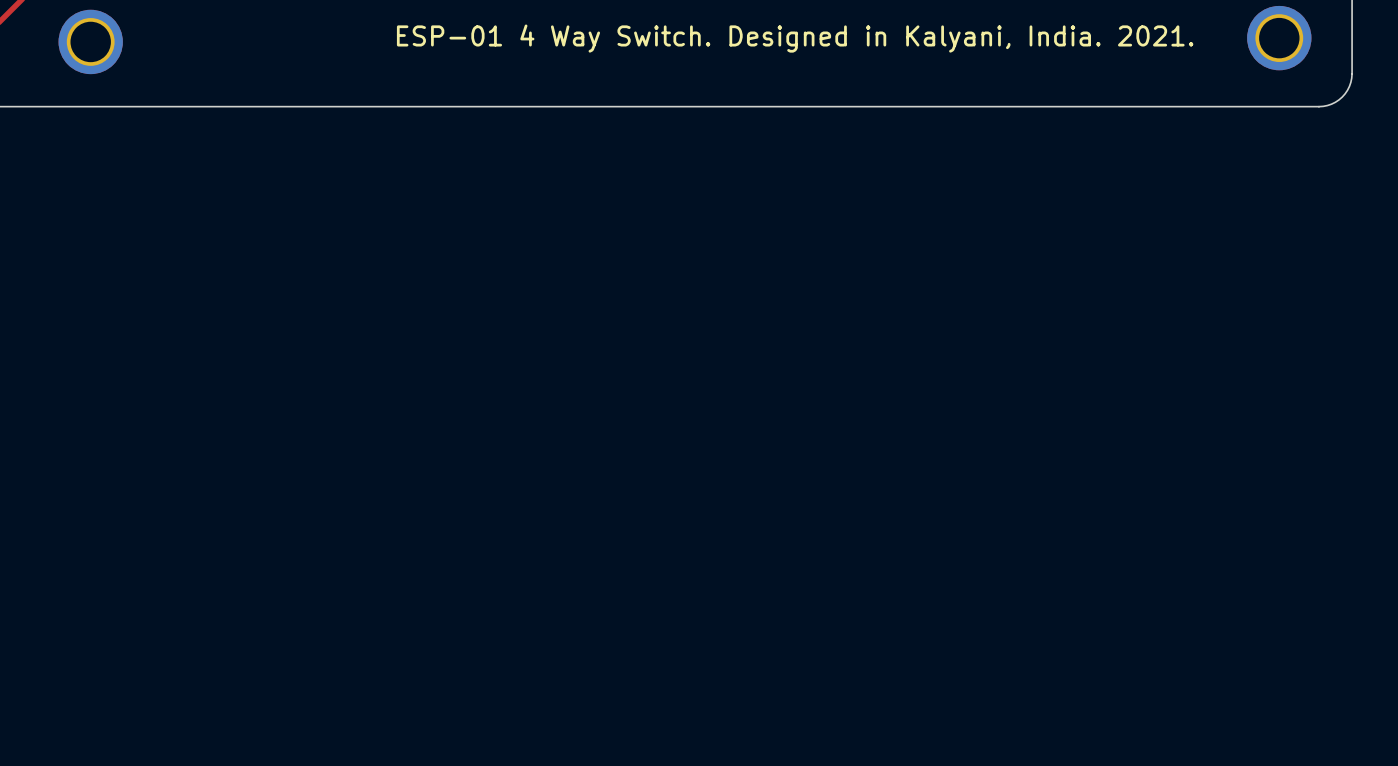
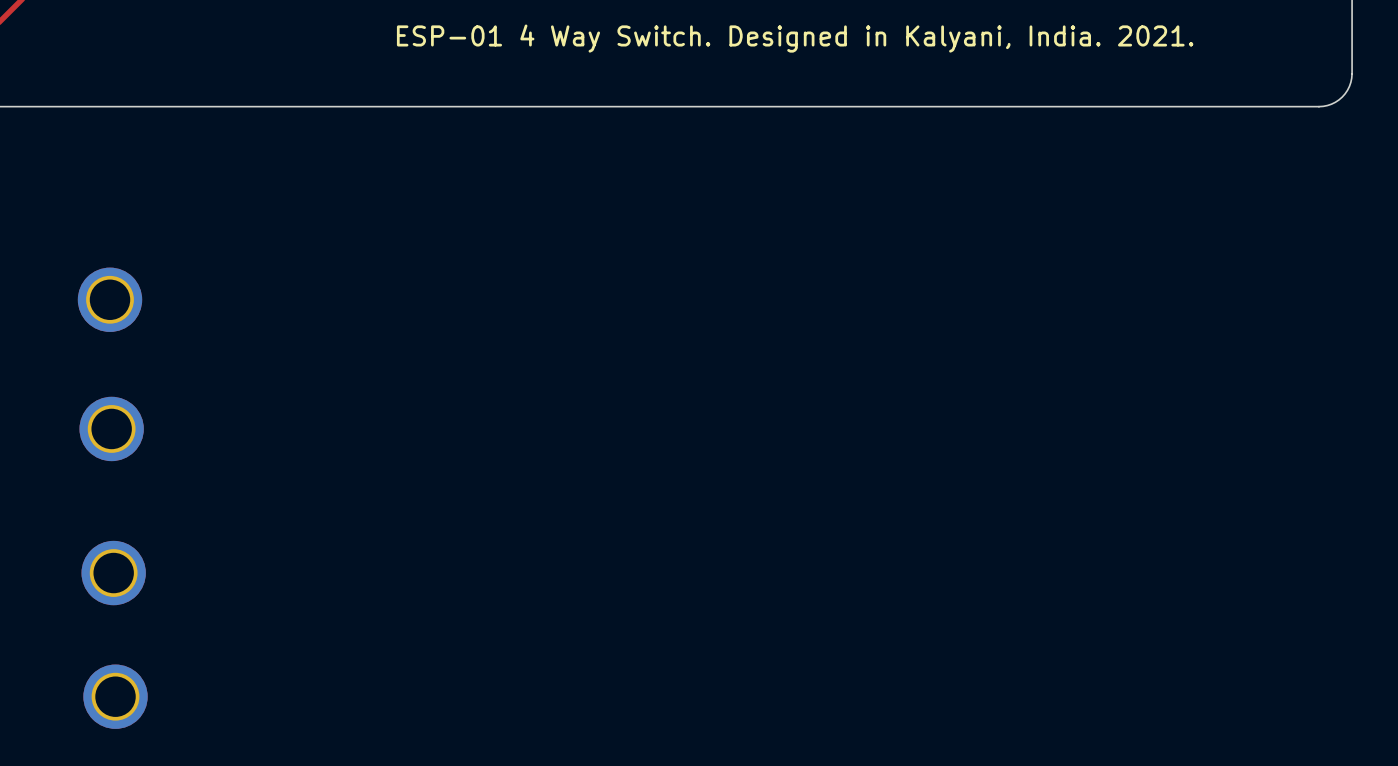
part: (1279, 38) -> none
part: (90, 41) -> none
part: none -> (110, 299)
part: none -> (111, 428)
part: none -> (113, 573)
part: none -> (115, 696)

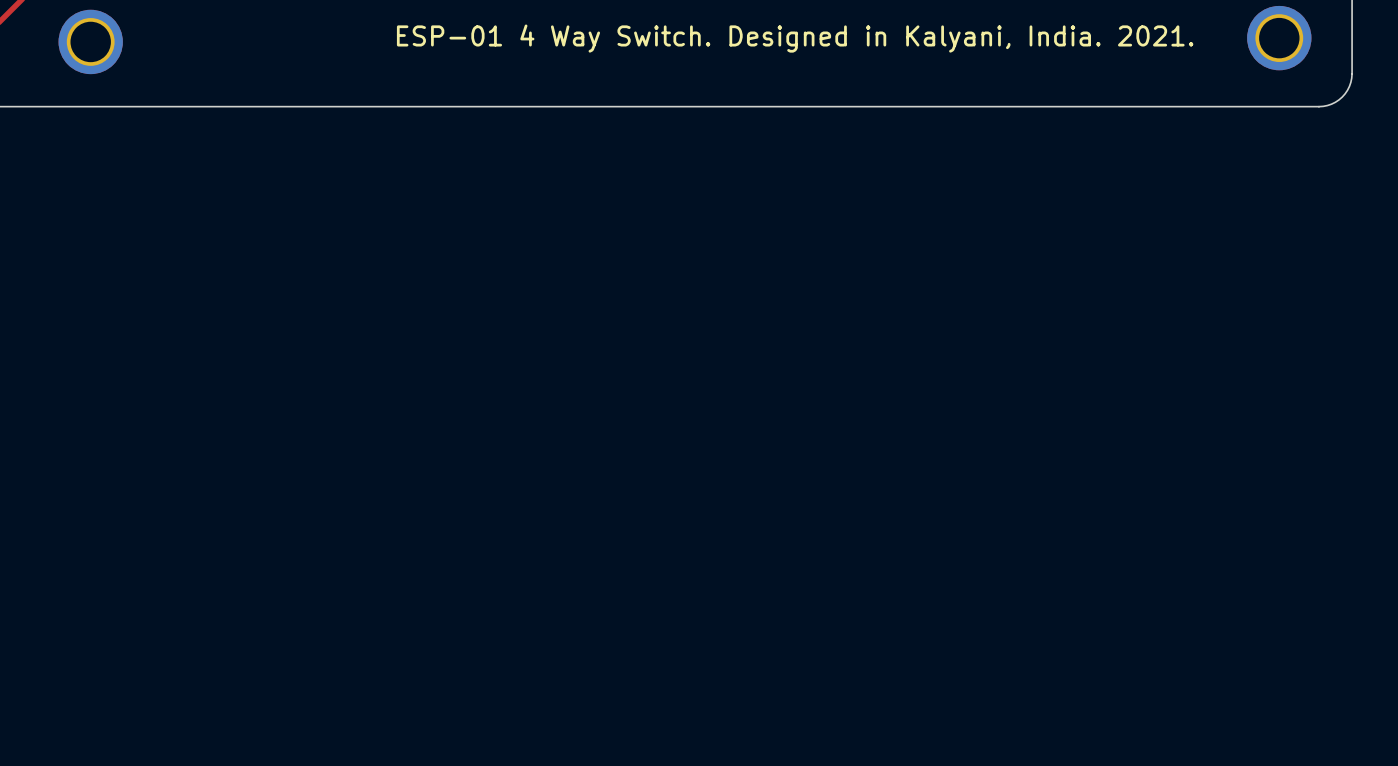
part: none -> (1279, 38)
part: none -> (90, 41)
part: (110, 299) -> none
part: (111, 428) -> none
part: (113, 573) -> none
part: (115, 696) -> none

